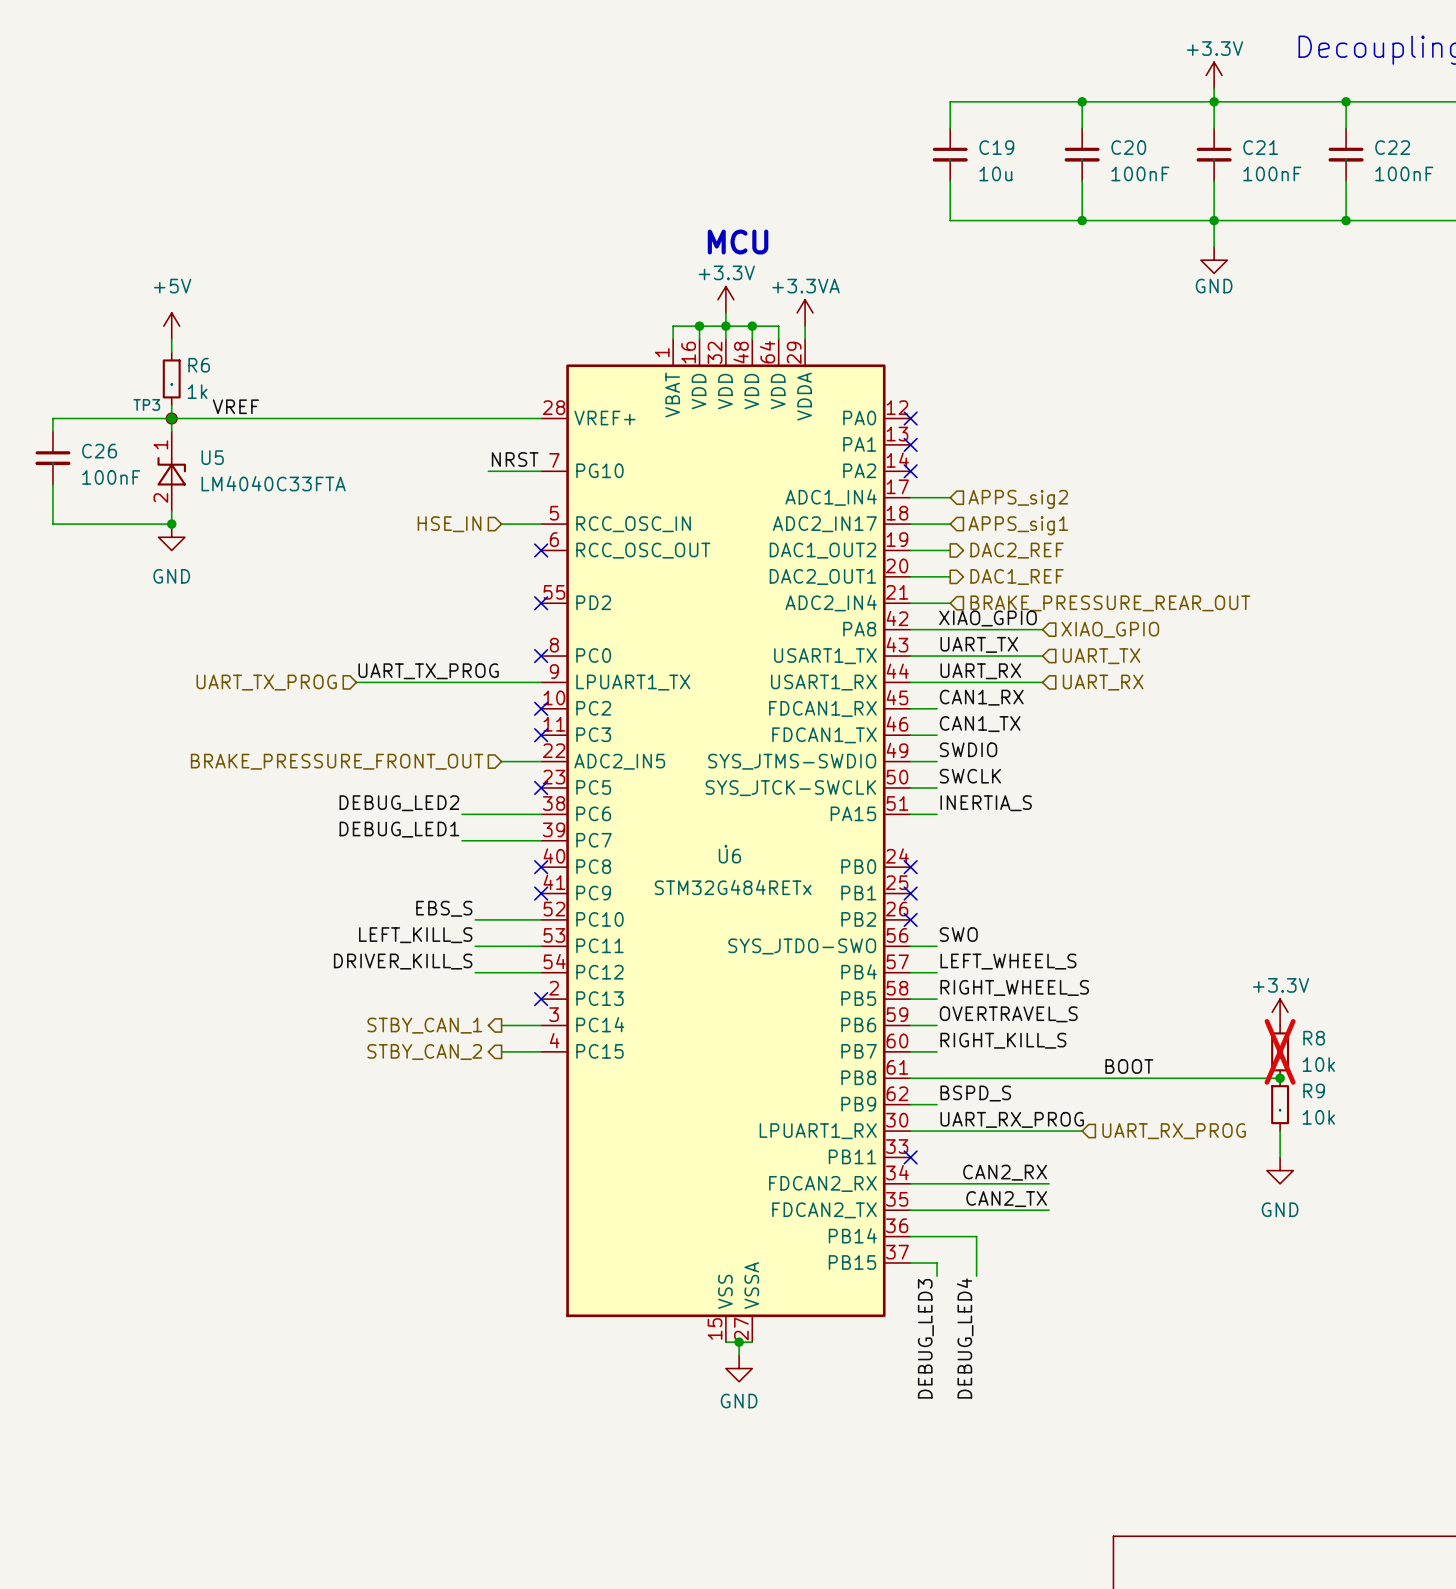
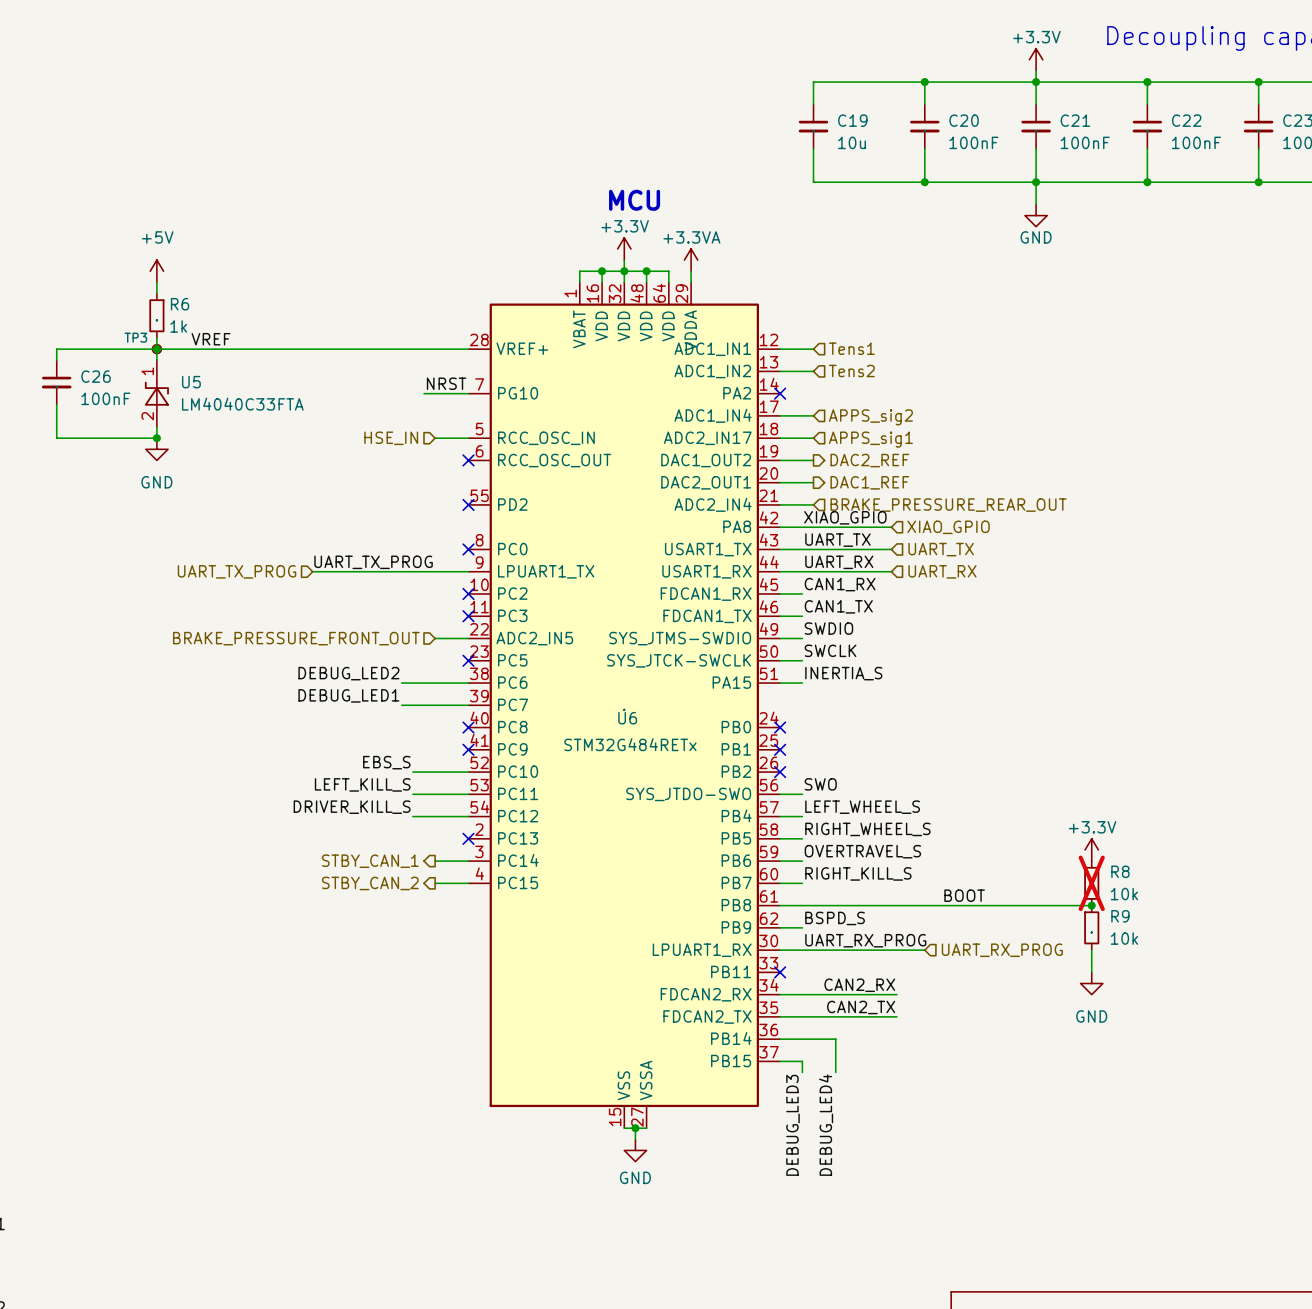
U6 pin name: PA0 (859, 418) -> ADC1_IN1 (712, 349)
wire: none -> (780, 349) (813, 349)
no-connect mark: (910, 418) -> none
hierarchical label: none -> Tens1 (851, 348)
U6 pin name: PA1 (859, 444) -> ADC1_IN2 (712, 371)
wire: none -> (780, 371) (813, 371)
no-connect mark: (910, 444) -> none
hierarchical label: none -> Tens2 (851, 370)

